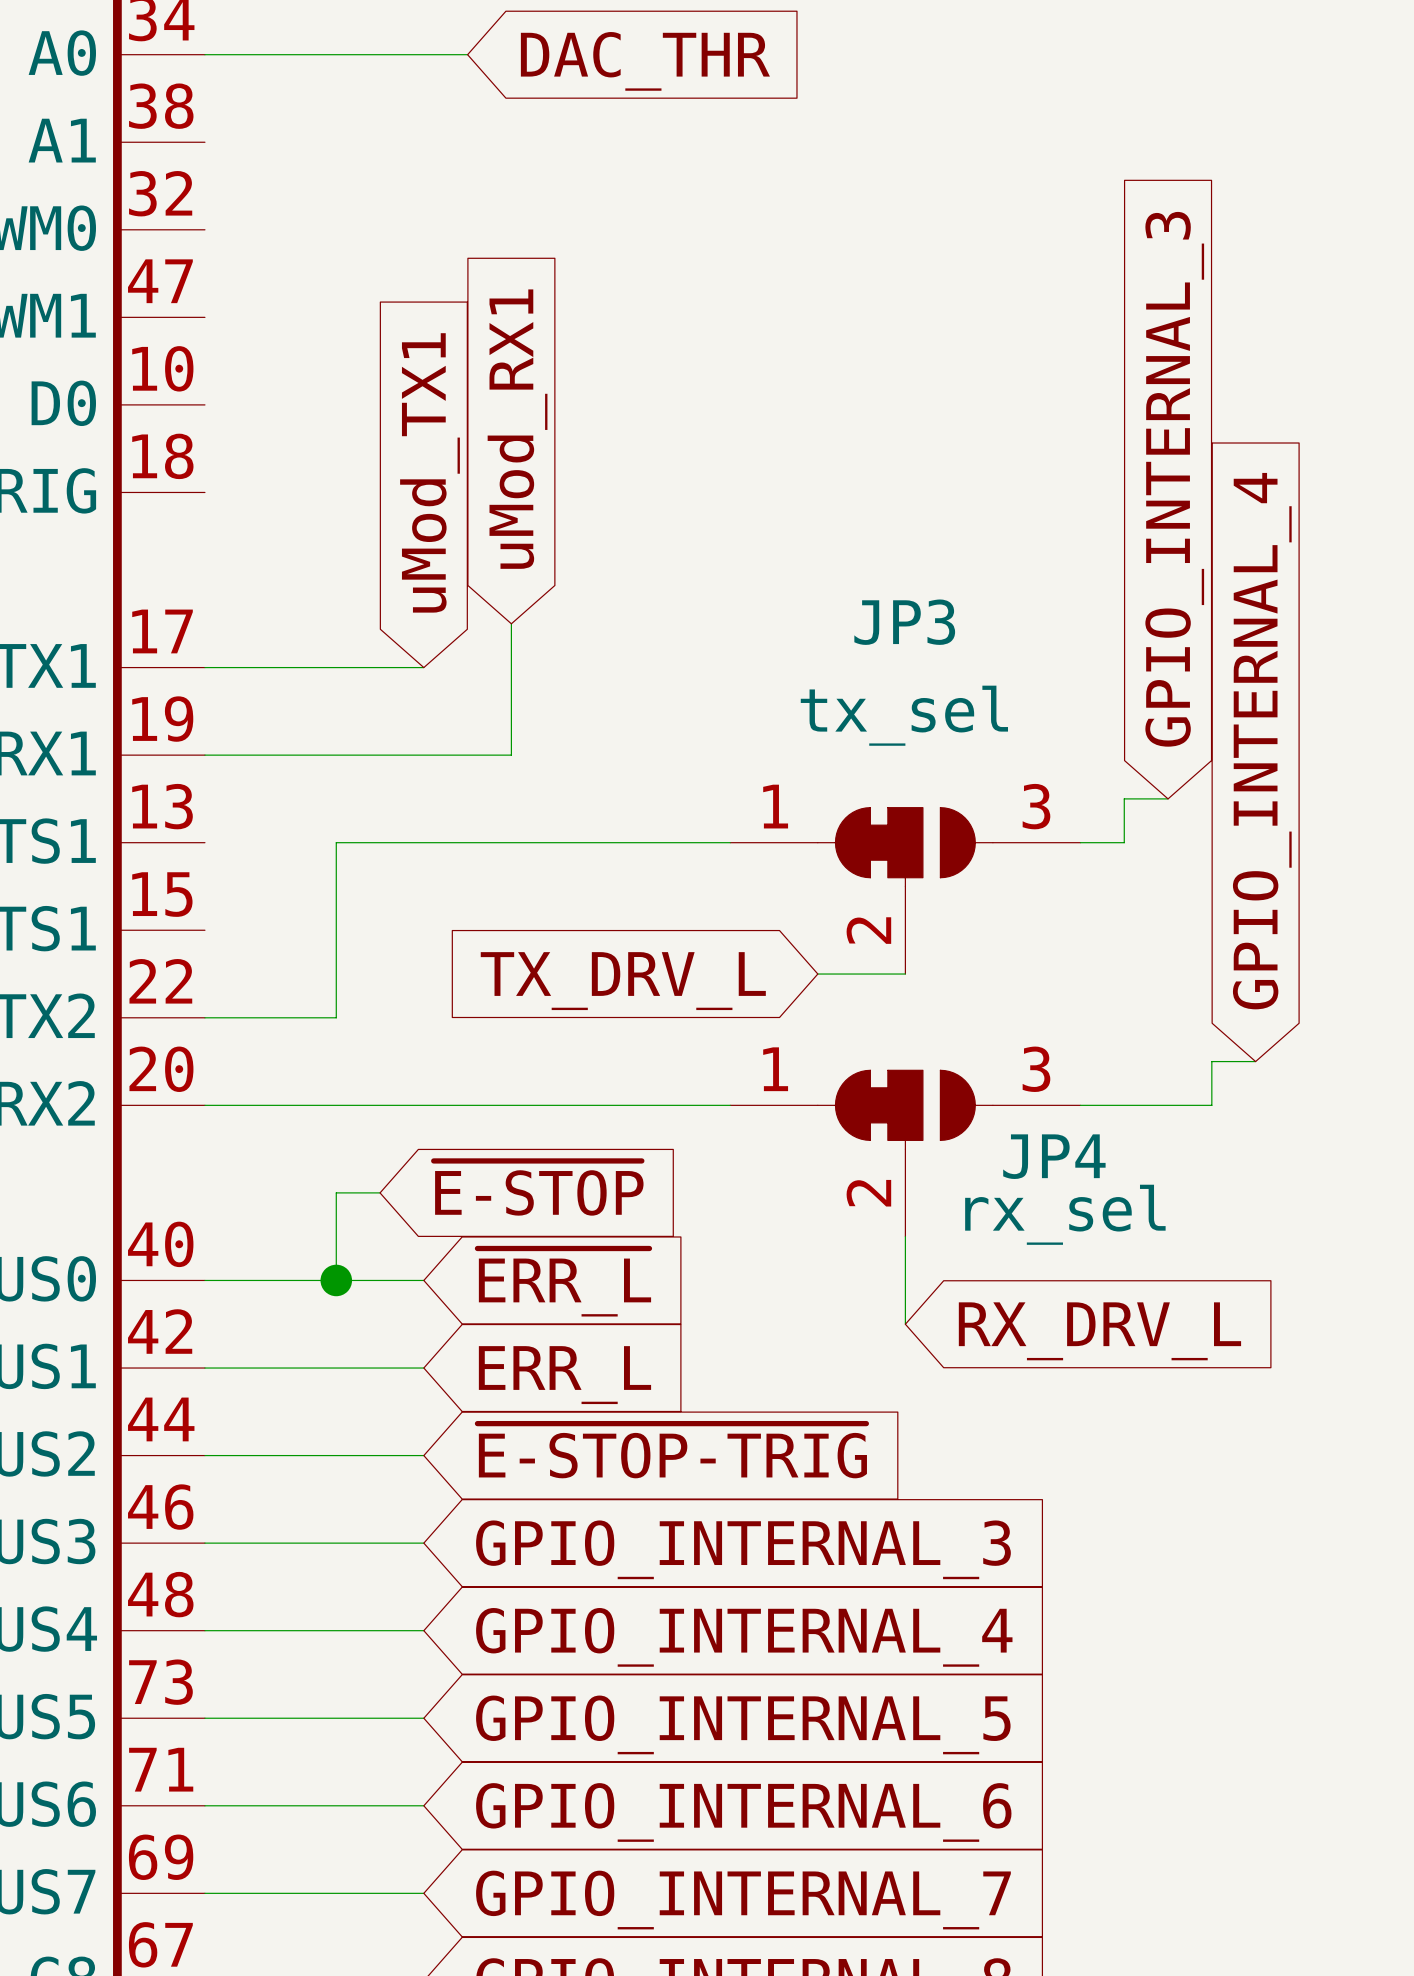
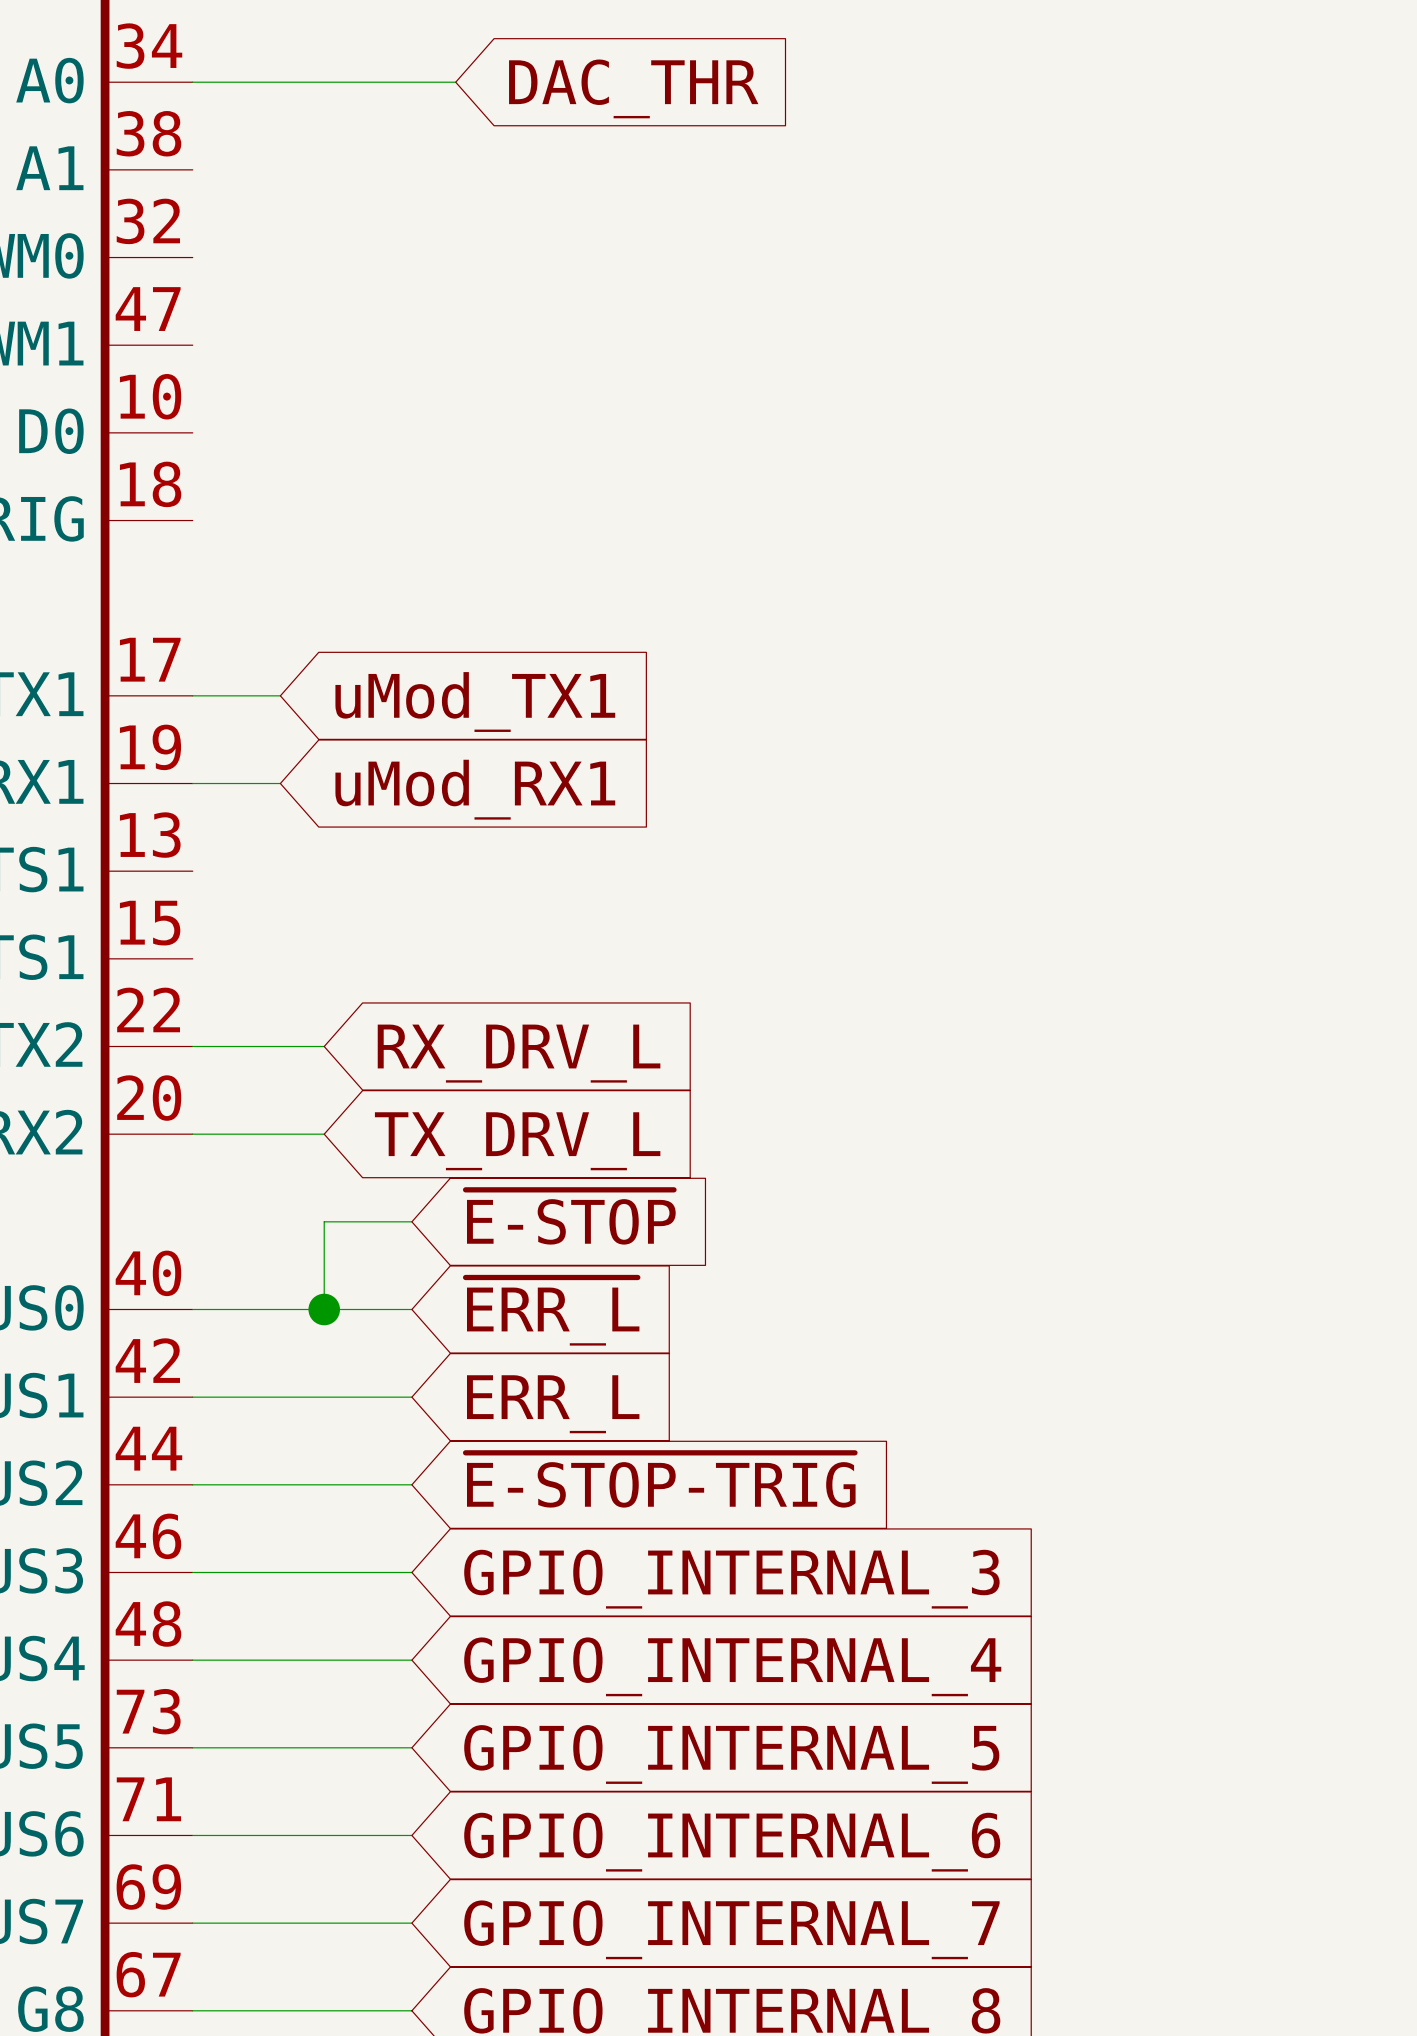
global label rotation: 0° (517, 429) -> 90° clockwise (475, 789)
global label rotation: 0° (429, 472) -> 90° clockwise (475, 702)
global label: GPIO_INTERNAL_3 (1174, 479) -> none
wire: (511, 623) (511, 755) (292, 755) -> none
wire: (292, 667) (423, 667) -> none
global label: GPIO_INTERNAL_4 (1262, 741) -> none
wire: (1168, 798) (1124, 798) (1124, 842) (1080, 842) -> none
wire: (730, 842) (336, 842) (336, 1017) -> none
JP3: tx_sel (905, 890) -> none
wire: (817, 974) (905, 974) -> none
global label rotation: 0° (623, 981) -> 180° (517, 1141)
wire: (1255, 1061) (1211, 1061) (1211, 1105) (1080, 1105) -> none
wire: (336, 1105) (730, 1105) -> none
JP4: rx_sel (905, 1153) -> none
global label position: ~{E-STOP} (538, 1188) -> ~{E-STOP} (570, 1217)
wire: none -> (368, 1221) (411, 1221)
wire: (905, 1236) (905, 1324) -> none
global label position: RX_DRV_L (1099, 1331) -> RX_DRV_L (519, 1053)

